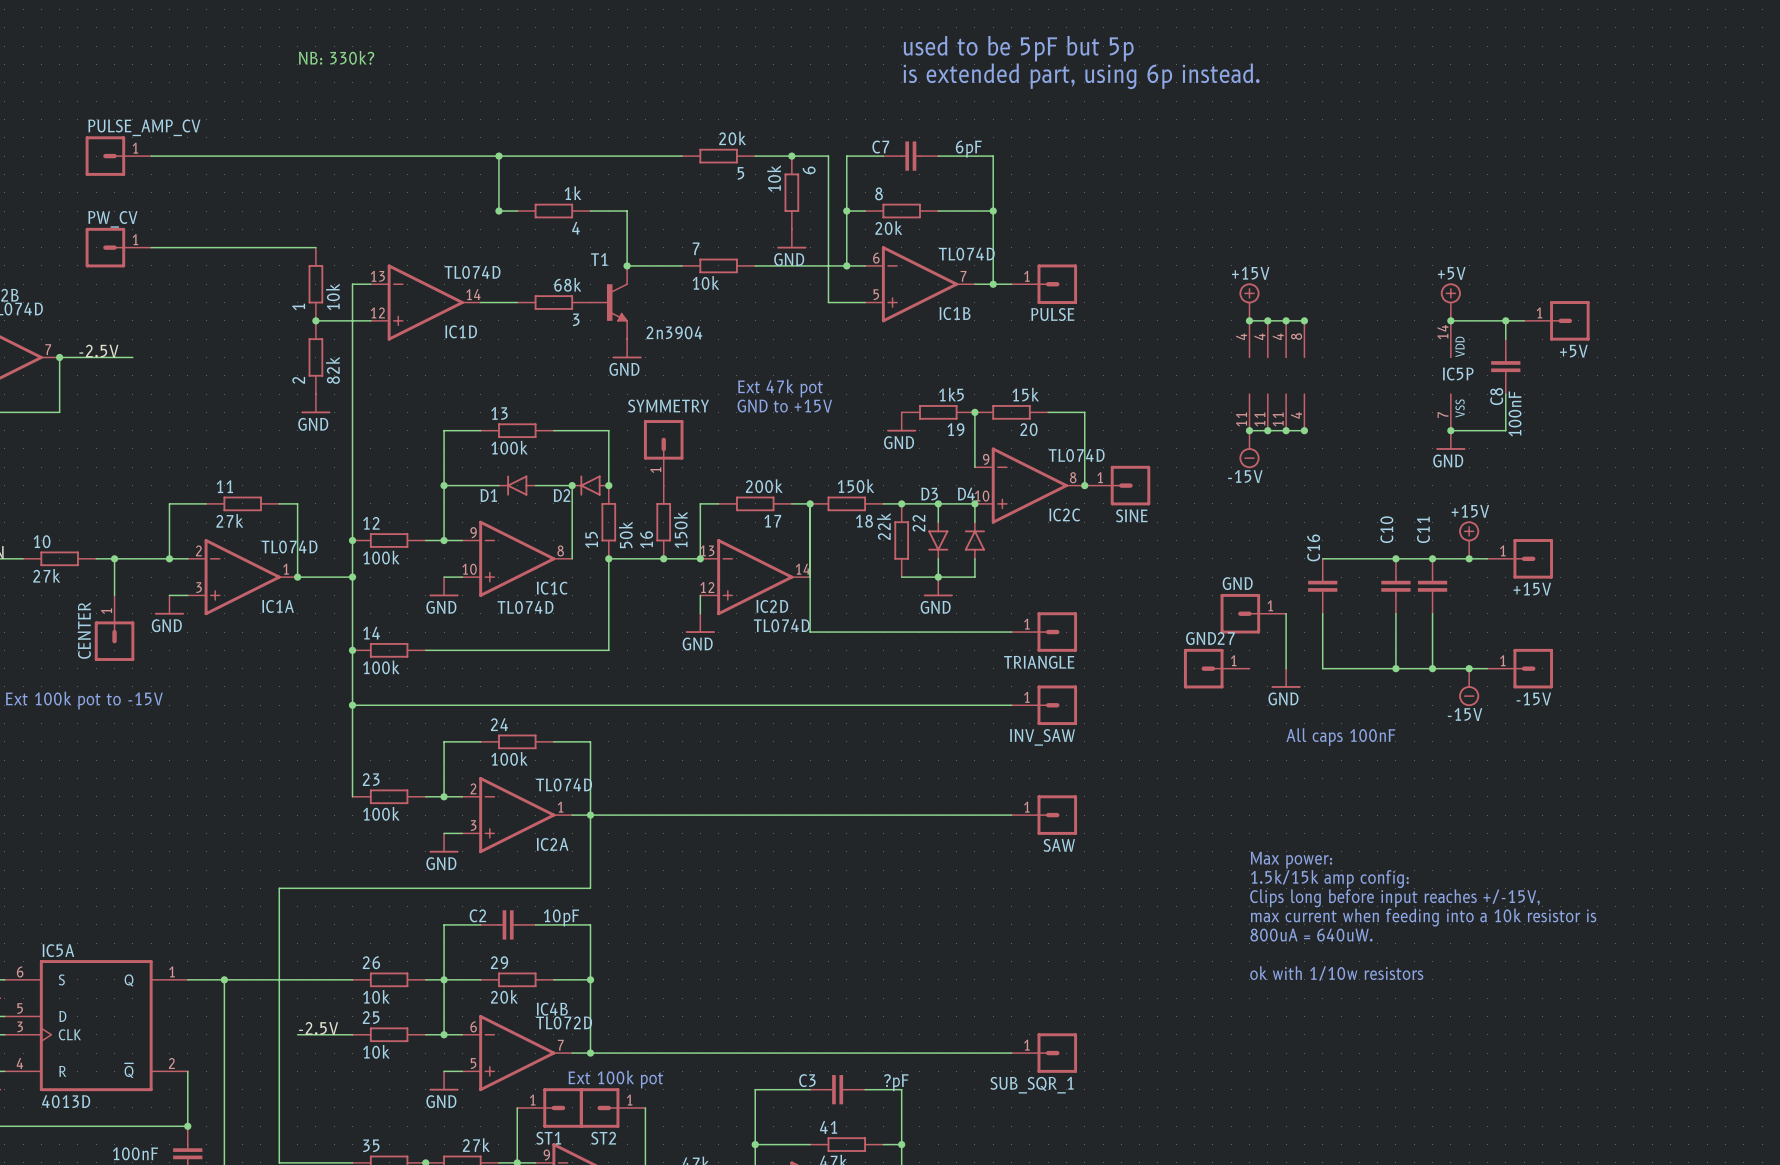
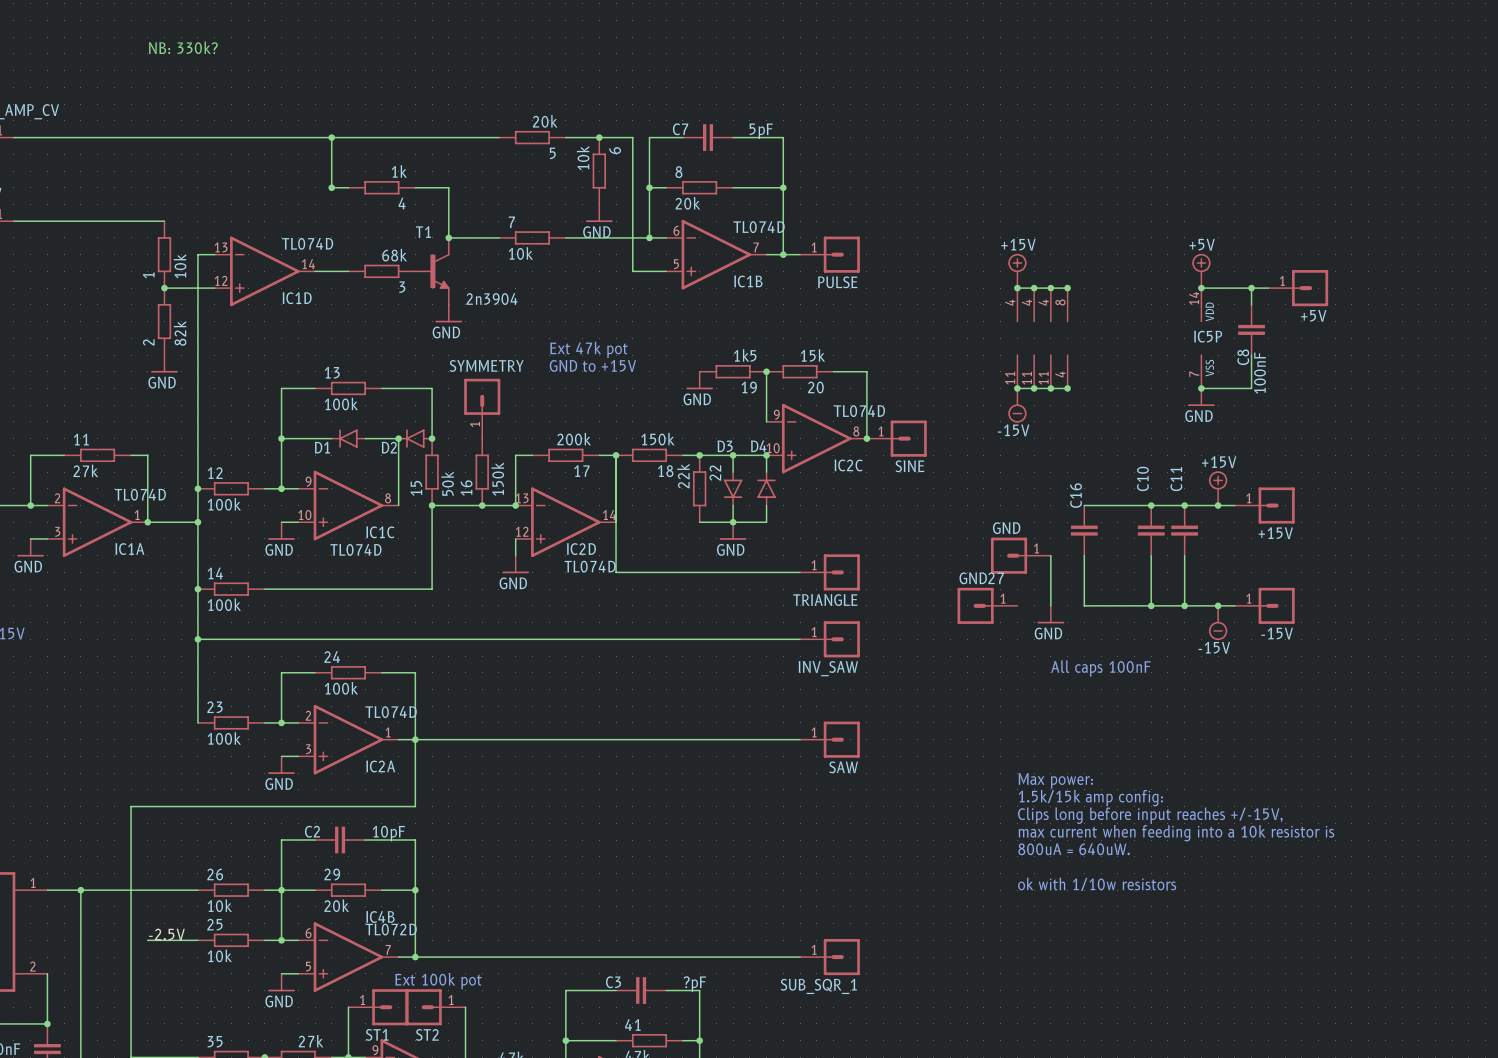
text: used to be 5pF but 5p (1018, 48) -> none
text: is extended part, using 6p instead. (1081, 76) -> none
C7 value: 6pF (968, 149) -> 5pF (761, 131)

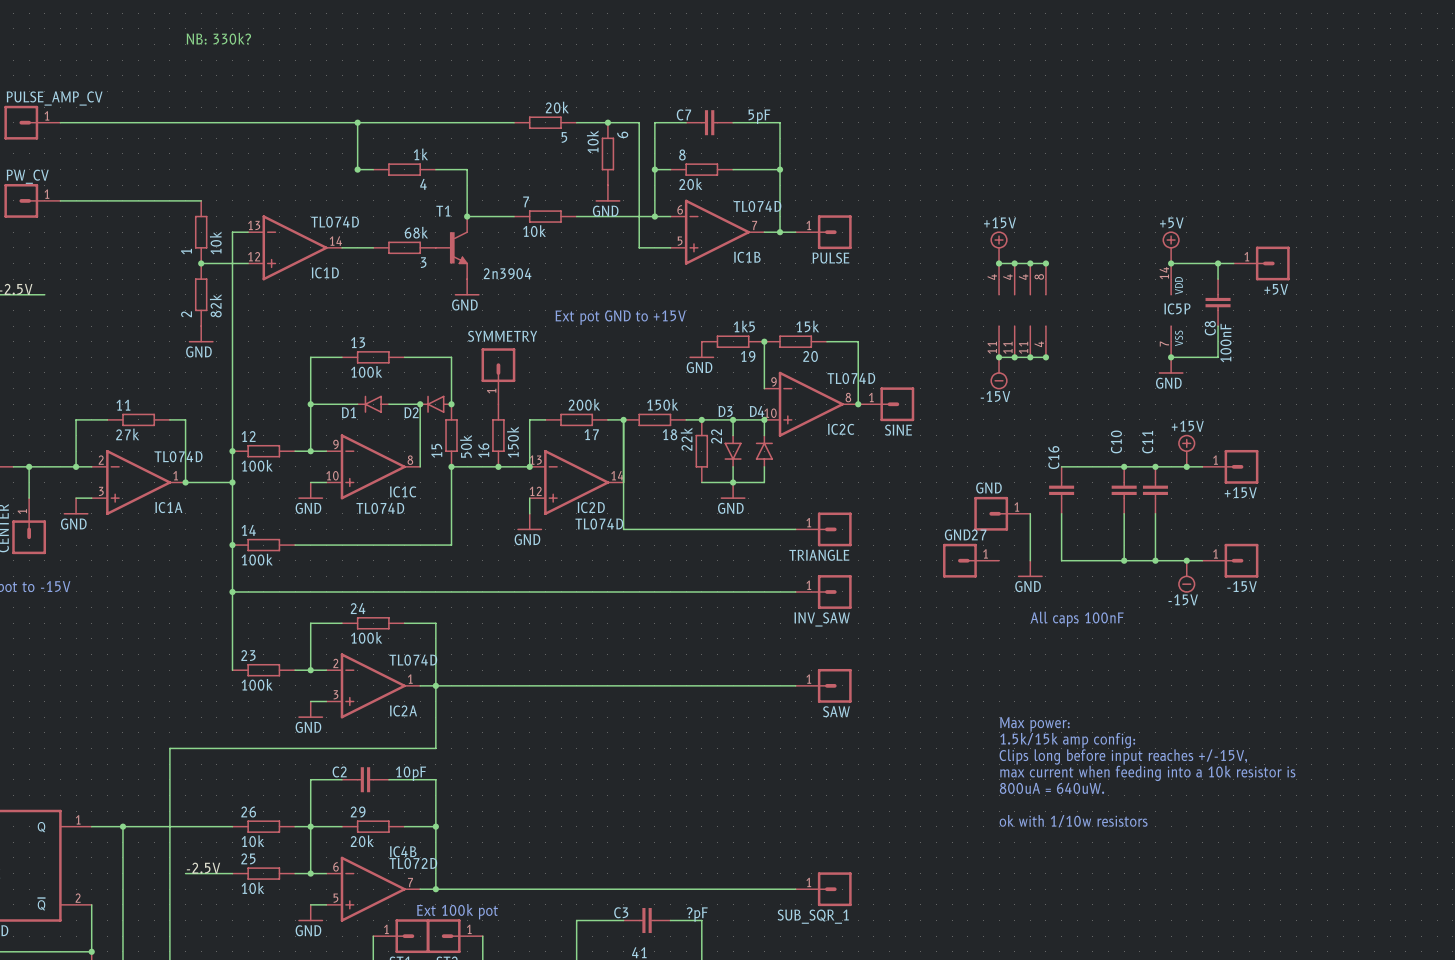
text: Ext 47k pot (588, 349) -> none
text: GND to +15V (592, 365) -> Ext pot GND to +15V (620, 317)

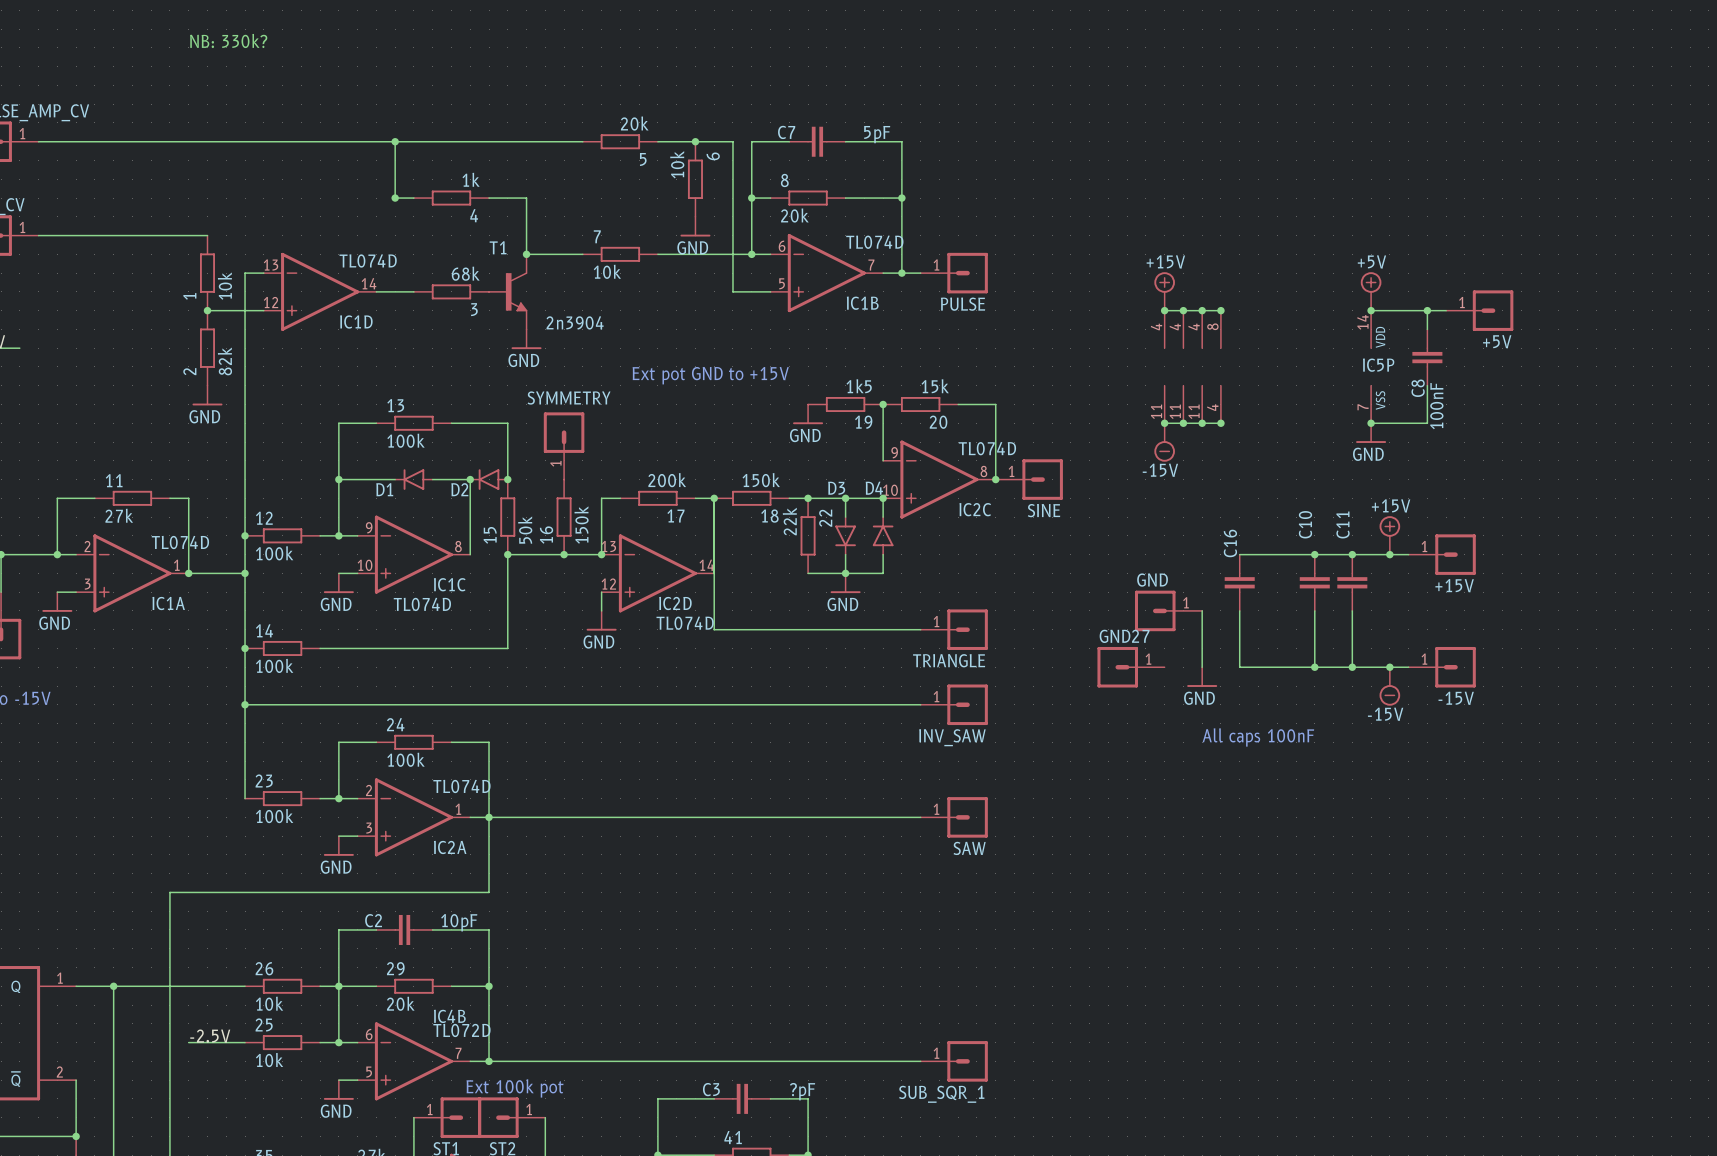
text: Max power: (1034, 724) -> none
text: 1.5k/15k amp config: (1067, 740) -> none
text: Clips long before input reaches +/-15V, (1123, 756) -> none
text: max current when feeding into a 10k resistor is (1147, 773) -> none
text: 800uA = 640uW. (1052, 788) -> none
text: ok with 1/10w resistors (1073, 821) -> none

